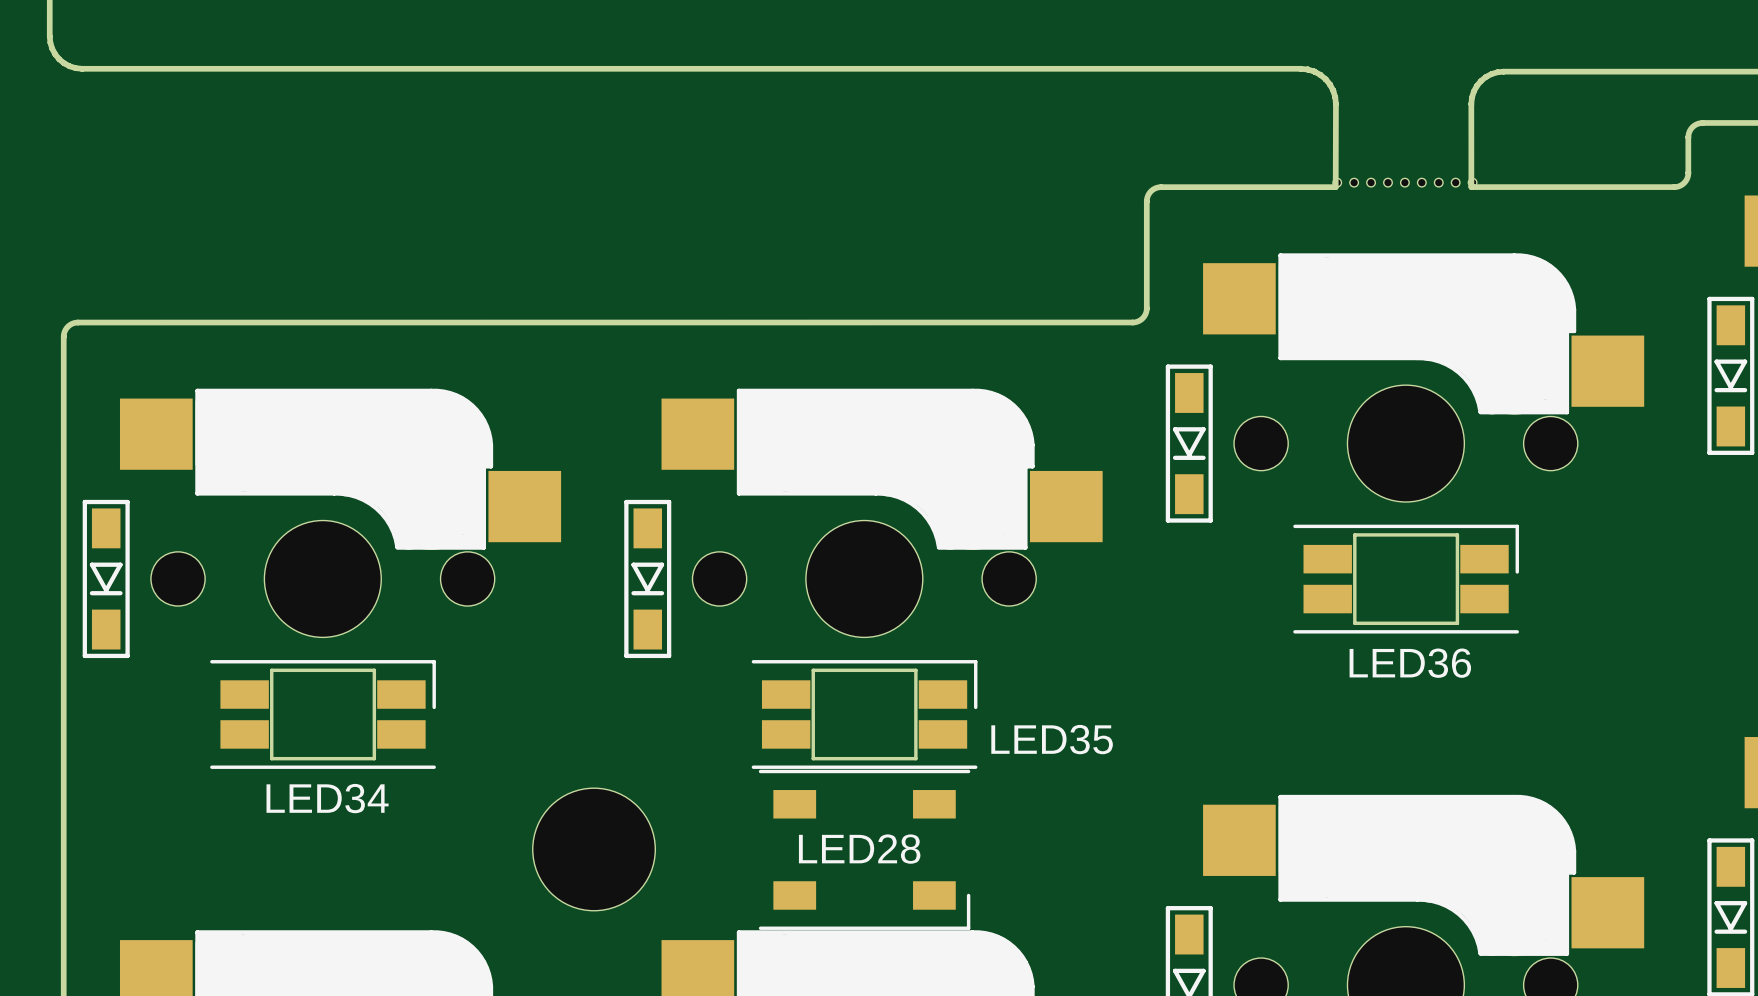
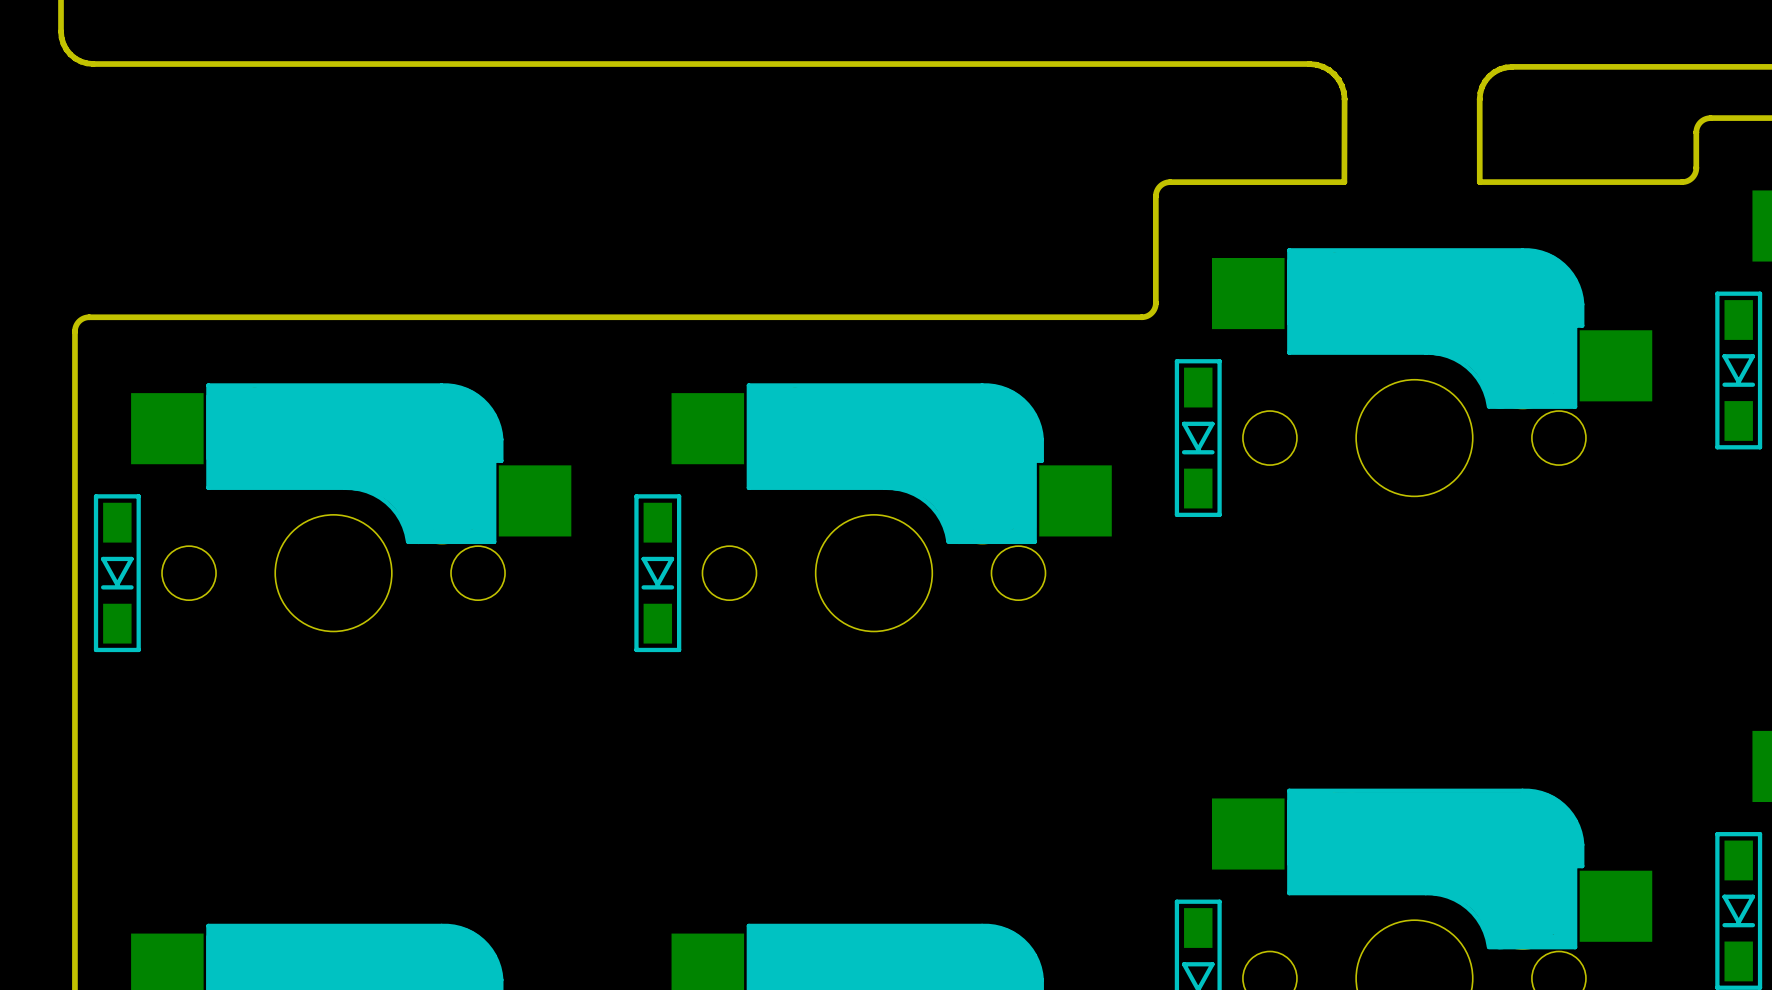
part: (1404, 182) -> none
LED36: (1406, 579) -> none
LED34: (323, 714) -> none
LED35: (864, 714) -> none
part: (594, 849) -> none
LED28: (864, 849) -> none

